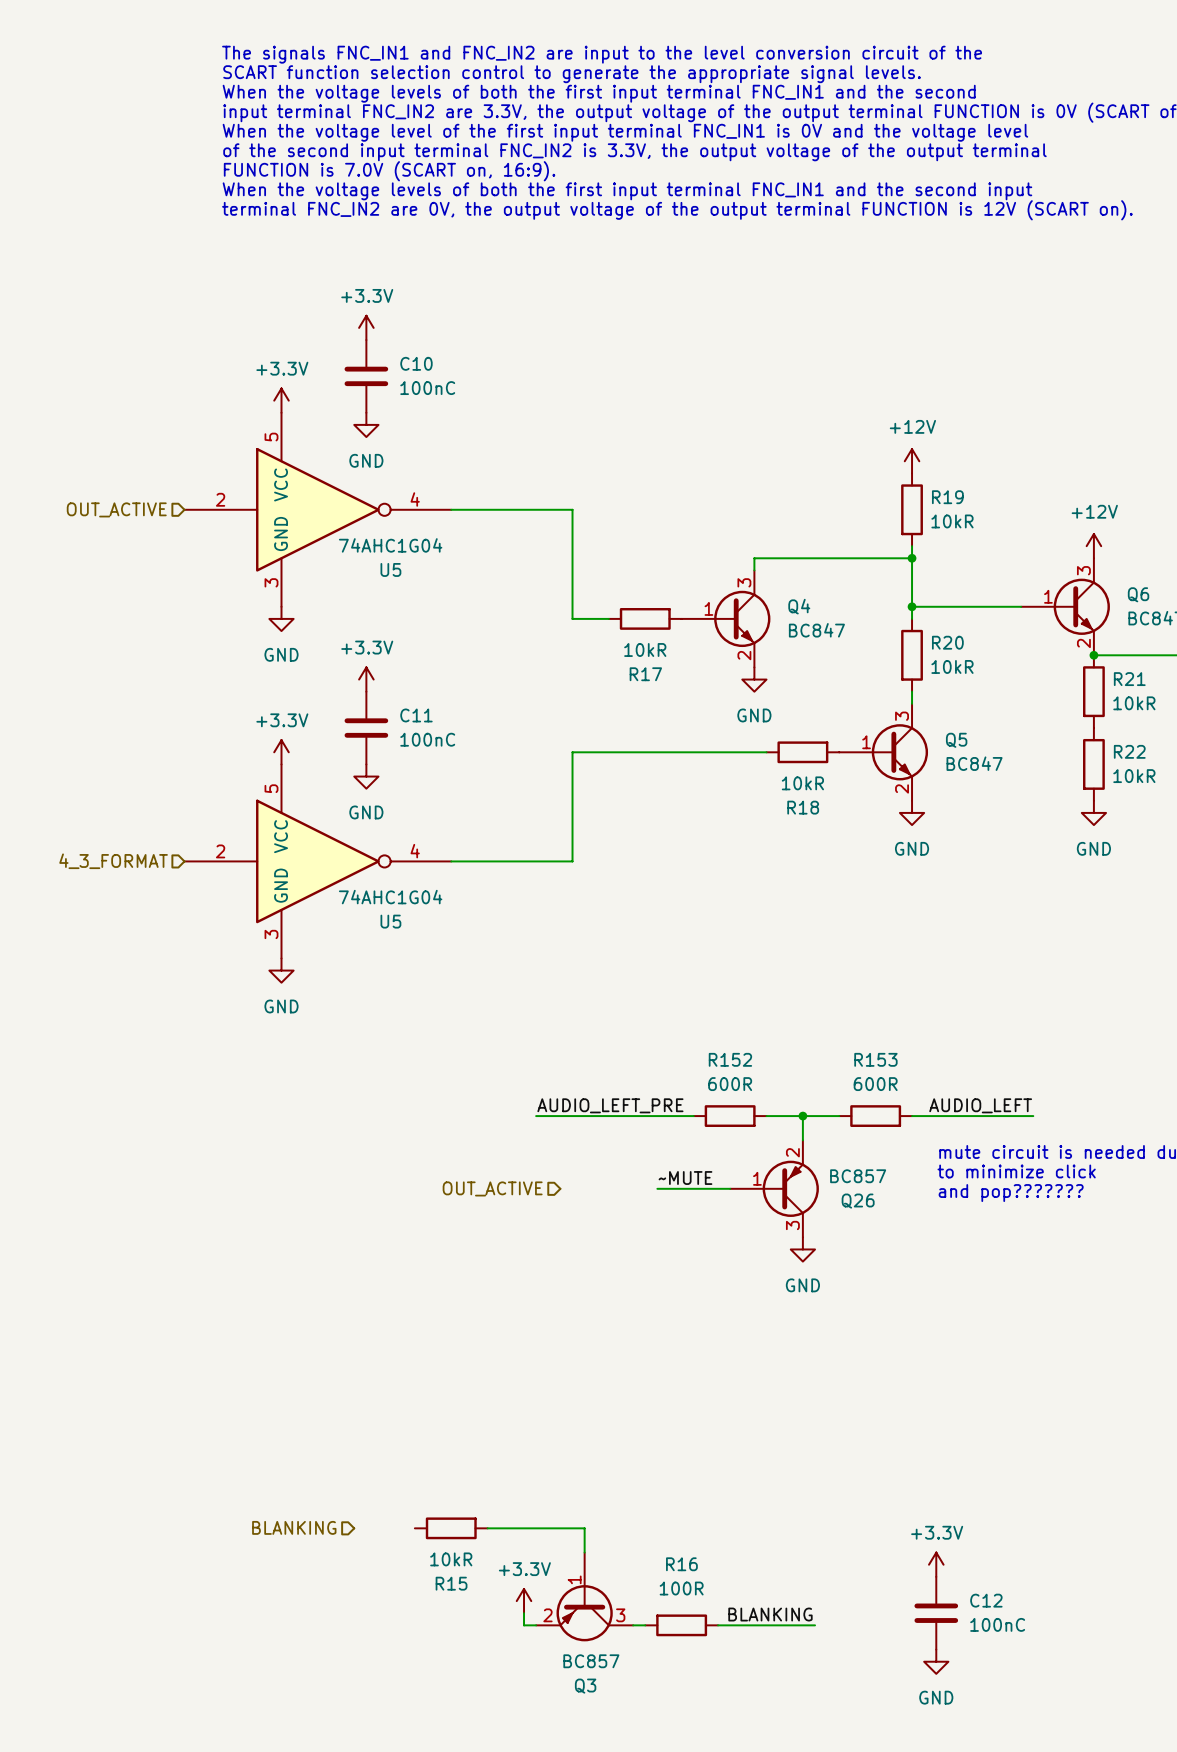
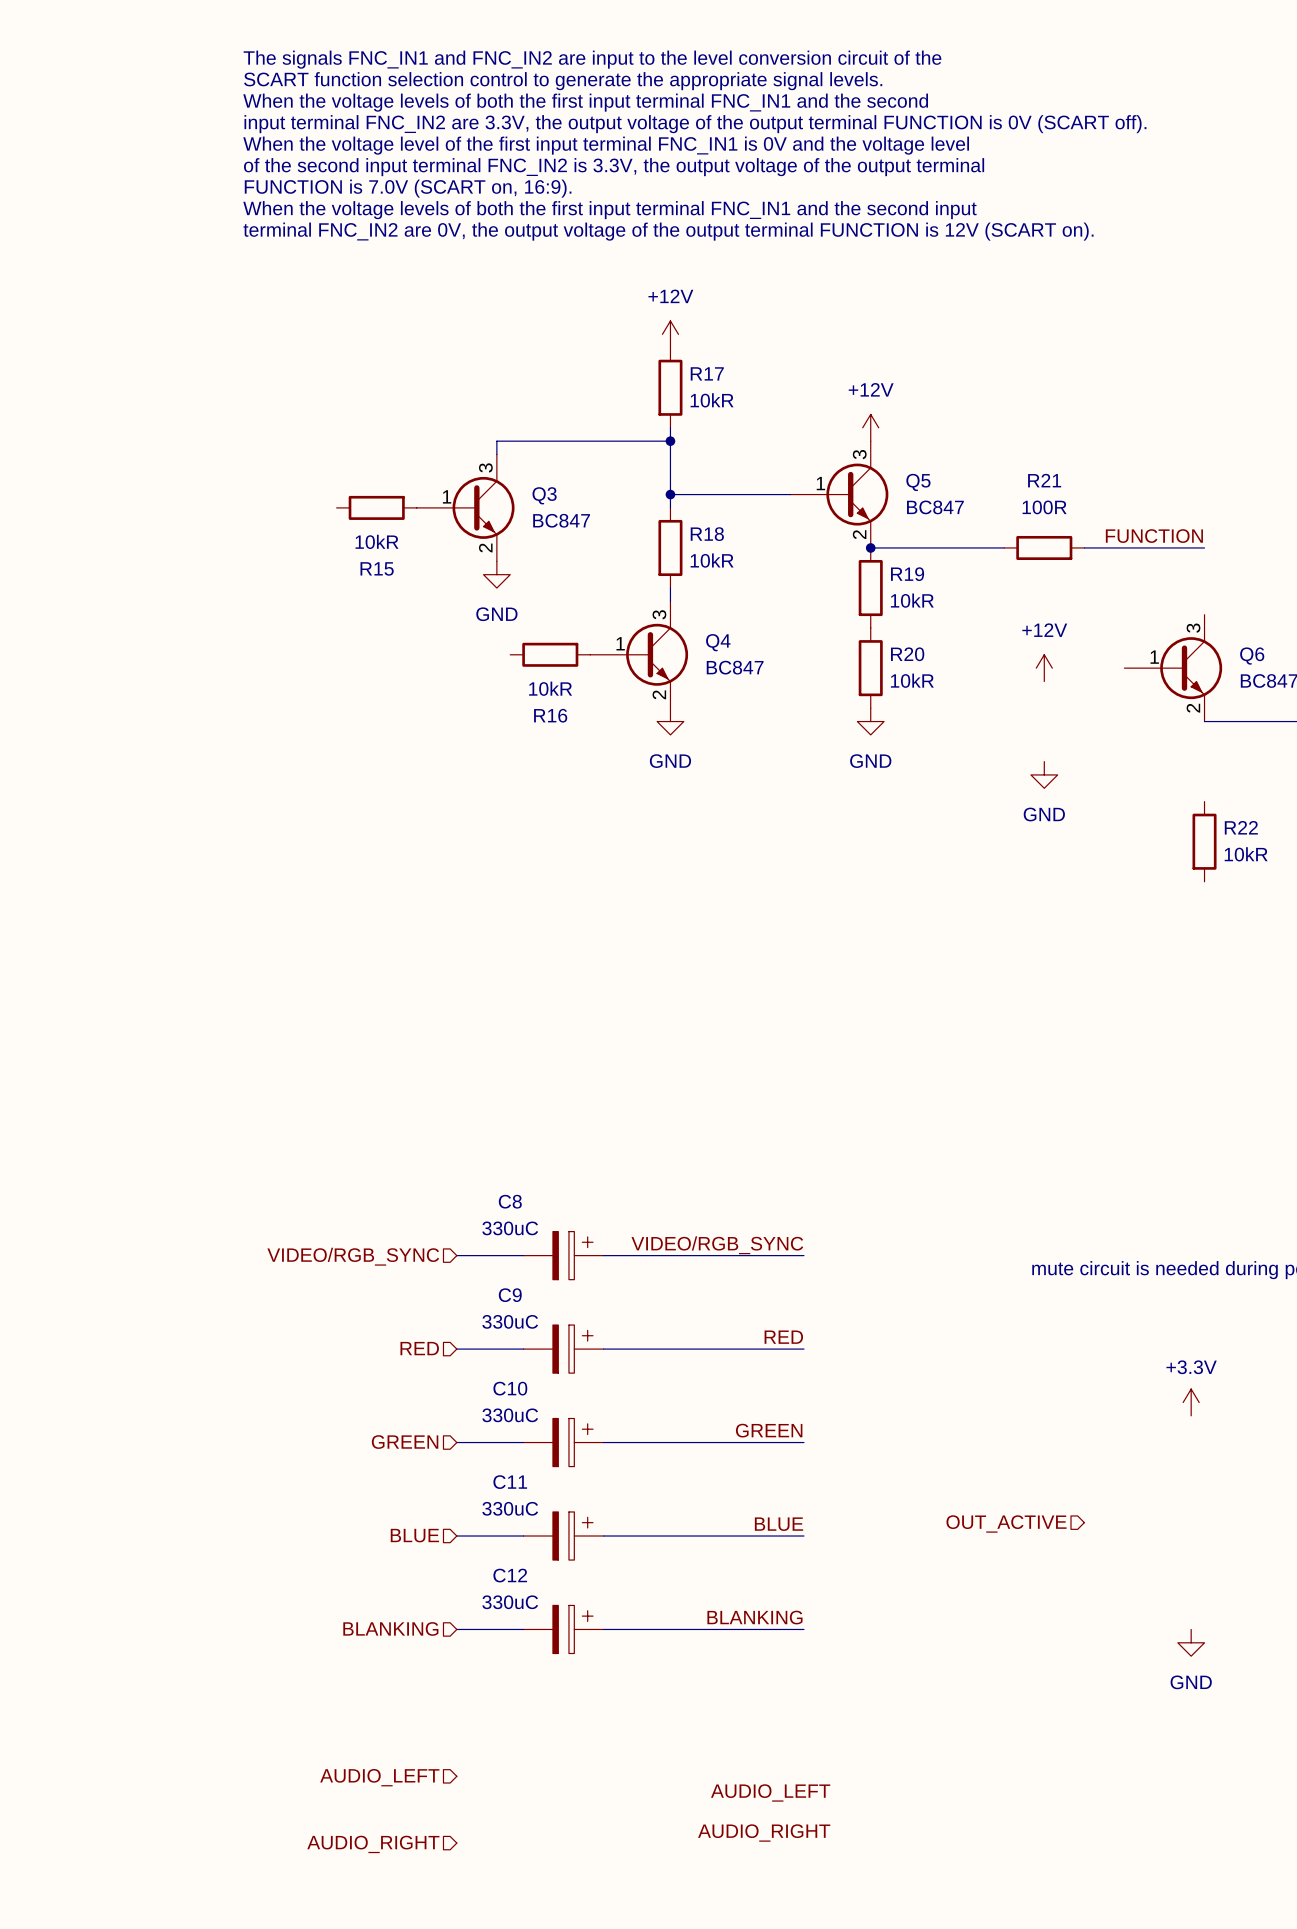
power symbol: none -> +12V (670, 334)
power symbol: +3.3V (366, 327) -> none
C10 symbol: [344, 340, 389, 413] -> [523, 1418, 604, 1467]
C10 name position: C10 (416, 363) -> C10 (510, 1388)
C10 value: 100nC (427, 388) -> 330uC (510, 1415)
wire: none -> (670, 427) (670, 507)
power symbol: none -> +12V (870, 427)
power symbol: +3.3V (281, 400) -> none
wire: none -> (670, 441) (496, 441) (496, 454)
junction: none -> (670, 441)
power symbol: GND (366, 424) -> none
wire: none -> (670, 494) (790, 494)
junction: none -> (670, 494)
power symbol: +12V (912, 461) -> none
label: none -> FUNCTION (1154, 536)
wire: none -> (870, 547) (1004, 547)
junction: none -> (870, 547)
hierarchical label: OUT_ACTIVE (116, 509) -> none
U5: 74AHC1G04 (317, 509) -> none
wire: (451, 509) (572, 509) (572, 618) (608, 618) -> none
R19 position: (912, 509) -> (870, 588)
power symbol: none -> GND (496, 574)
wire: none -> (670, 588) (670, 601)
wire: (912, 546) (912, 618) -> none
power symbol: +12V (1093, 546) -> none
wire: (912, 558) (754, 558) (754, 570) -> none
junction: (912, 558) -> none
wire: (912, 606) (1021, 606) -> (1084, 547) (1204, 547)
junction: (912, 606) -> none
power symbol: none -> +12V (1044, 668)
power symbol: GND (281, 618) -> none
R17 rotation: 0° (645, 618) -> 90° clockwise (670, 387)
R17 position: (645, 618) -> (670, 387)
Q4 position: (726, 618) -> (639, 654)
R17 value position: 10kR (645, 649) -> 10kR (712, 400)
power symbol: none -> GND (670, 721)
R20 position: (912, 655) -> (870, 668)
junction: (1093, 655) -> none
R17 name position: R17 (645, 674) -> R17 (707, 373)
power symbol: +3.3V (366, 679) -> none
power symbol position: GND (754, 679) -> GND (870, 721)
R21 name position: R21 (1129, 679) -> R21 (1044, 480)
C11 symbol: [344, 691, 389, 765] -> [523, 1511, 604, 1561]
wire: (912, 691) (912, 703) -> none
R21 rotation: 0° (1093, 691) -> 90° clockwise (1044, 547)
R21 position: (1093, 691) -> (1044, 547)
power symbol: none -> GND (1044, 774)
R21 value: 10kR (1134, 703) -> 100R (1044, 507)
C11 name position: C11 (416, 715) -> C11 (510, 1482)
C11 value: 100nC (427, 739) -> 330uC (510, 1508)
power symbol: +3.3V (281, 752) -> none
wire: (766, 752) (572, 752) (572, 861) (451, 861) -> none
R18 rotation: 0° (802, 752) -> 90° clockwise (670, 547)
R18 position: (802, 752) -> (670, 547)
Q5 position: (883, 752) -> (839, 494)
power symbol: GND (366, 776) -> none
R18 value position: 10kR (802, 783) -> 10kR (712, 560)
R18 name position: R18 (803, 807) -> R18 (707, 534)
power symbol: GND (912, 812) -> none
power symbol: GND (1093, 812) -> none
hierarchical label: 4_3_FORMAT (113, 861) -> none
U5: 74AHC1G04 (317, 861) -> none
power symbol: GND (281, 970) -> none
label: AUDIO_LEFT_PRE (610, 1105) -> none
label: AUDIO_LEFT (980, 1105) -> none
wire: (536, 1116) (693, 1116) -> none
R152: 600R (730, 1116) -> none
wire: (766, 1116) (839, 1116) -> none
wire: (802, 1116) (802, 1140) -> none
junction: (802, 1116) -> none
R153: 600R (875, 1116) -> none
wire: (912, 1116) (1033, 1116) -> none
label: none -> VIDEO/RGB_SYNC (717, 1245)
wire: none -> (456, 1255) (523, 1255)
C8: none -> 330uC (563, 1255)
wire: none -> (603, 1255) (803, 1255)
hierarchical label: none -> VIDEO/RGB_SYNC (353, 1256)
text: to minimize click (1016, 1171) -> none
label: ~MUTE (685, 1178) -> none
hierarchical label: OUT_ACTIVE (492, 1188) -> none
wire: (657, 1188) (730, 1188) -> none
Q26: BC857 (774, 1188) -> none
text: and pop??????? (1011, 1193) -> none
label: none -> RED (783, 1337)
hierarchical label: none -> RED (419, 1348)
wire: none -> (456, 1349) (523, 1349)
C9: none -> 330uC (563, 1349)
wire: none -> (603, 1349) (803, 1349)
power symbol: GND (802, 1249) -> none
power symbol: none -> +3.3V (1191, 1402)
label: none -> GREEN (769, 1430)
hierarchical label: none -> GREEN (405, 1442)
wire: none -> (456, 1442) (523, 1442)
wire: none -> (603, 1442) (803, 1442)
hierarchical label: none -> OUT_ACTIVE (1006, 1523)
label: none -> BLUE (779, 1524)
hierarchical label: none -> BLUE (414, 1535)
wire: none -> (456, 1536) (523, 1536)
wire: none -> (603, 1536) (803, 1536)
wire: none -> (456, 1629) (523, 1629)
wire: none -> (603, 1629) (803, 1629)
power symbol: none -> GND (1191, 1642)
hierarchical label position: BLANKING (294, 1527) -> BLANKING (390, 1628)
R15 position: (451, 1528) -> (376, 507)
wire: (487, 1528) (584, 1528) (584, 1552) -> none
Q3 symbol: [536, 1552, 634, 1642] -> [416, 454, 515, 562]
R16 name position: R16 (681, 1564) -> R16 (550, 715)
power symbol: +3.3V (936, 1564) -> none
C12 symbol: [914, 1576, 959, 1650] -> [523, 1605, 604, 1654]
R16 value: 100R (681, 1588) -> 10kR (550, 688)
C12 name position: C12 (986, 1600) -> C12 (510, 1575)
power symbol: +3.3V (524, 1601) -> none
hierarchical label: none -> AUDIO_LEFT (379, 1777)
wire: (524, 1613) (524, 1625) (536, 1625) -> none
label position: BLANKING (770, 1614) -> BLANKING (754, 1617)
C12 value: 100nC (997, 1624) -> 330uC (510, 1602)
wire: (633, 1625) (645, 1625) -> none
R16 position: (681, 1625) -> (550, 654)
wire: (718, 1625) (815, 1625) -> none
label: none -> AUDIO_LEFT (770, 1792)
Q3 value: BC857 (591, 1661) -> BC847 (561, 520)
power symbol: GND (936, 1661) -> none
label: none -> AUDIO_RIGHT (764, 1833)
hierarchical label: none -> AUDIO_RIGHT (373, 1844)
Q3 name position: Q3 (585, 1686) -> Q3 (544, 495)

